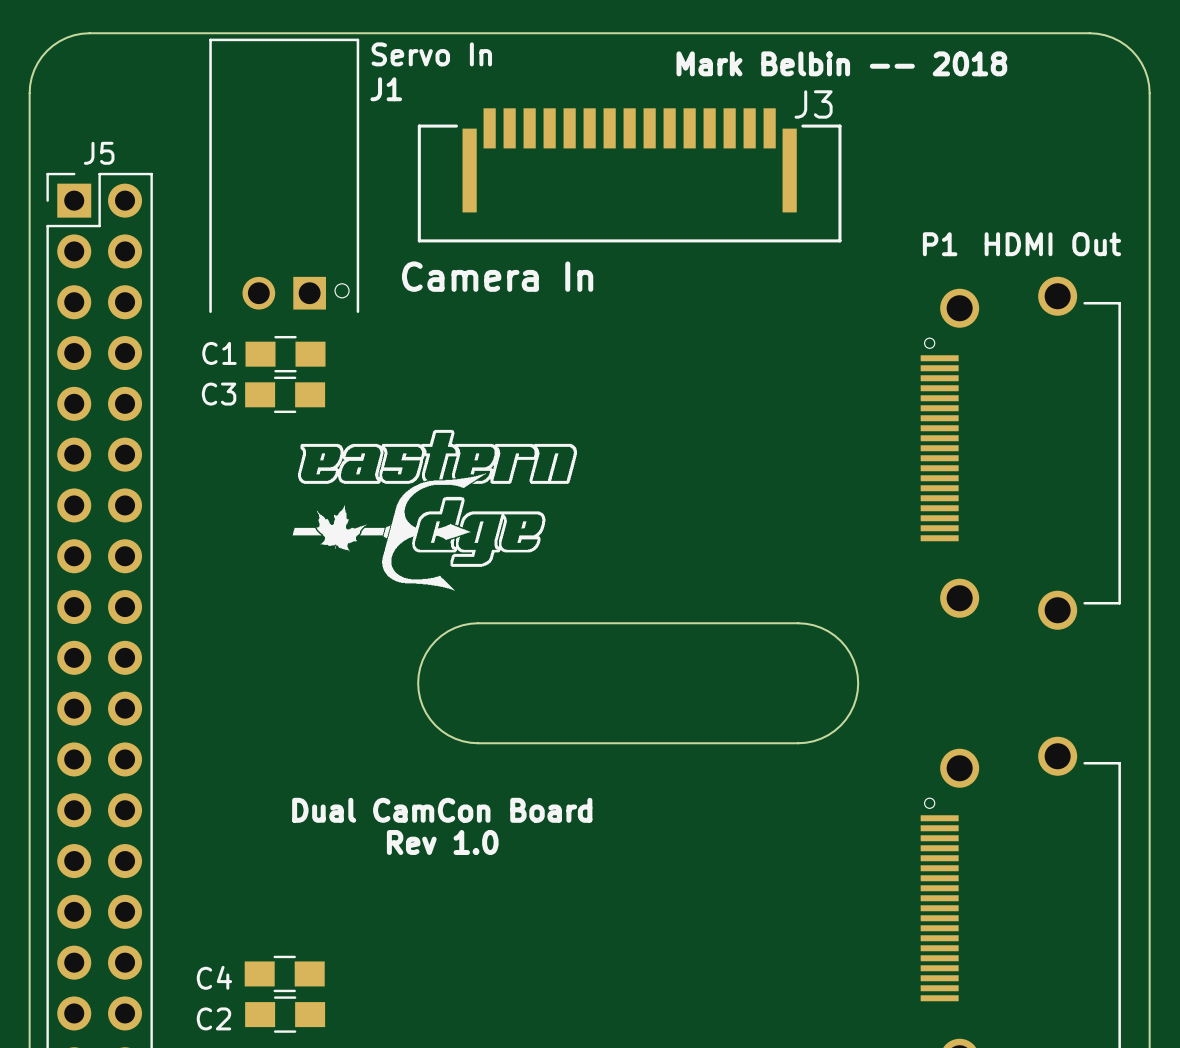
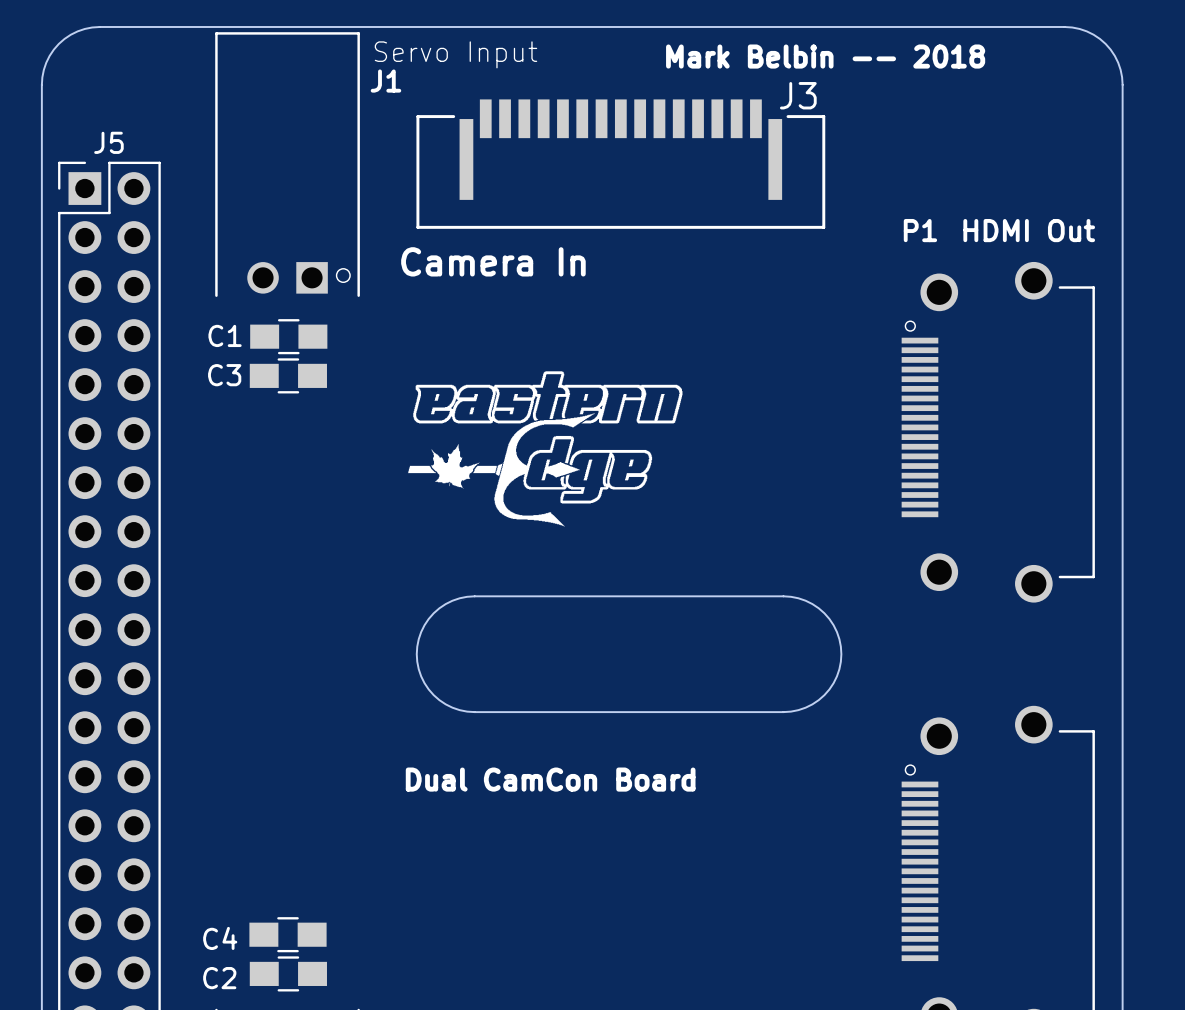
J1 value: Servo In (431, 54) -> Servo Input (455, 54)
drawing position: (434, 510) -> (545, 448)
text position: Dual CamCon Board (442, 810) -> Dual CamCon Board (550, 779)
text: Rev 1.0 (442, 842) -> none

